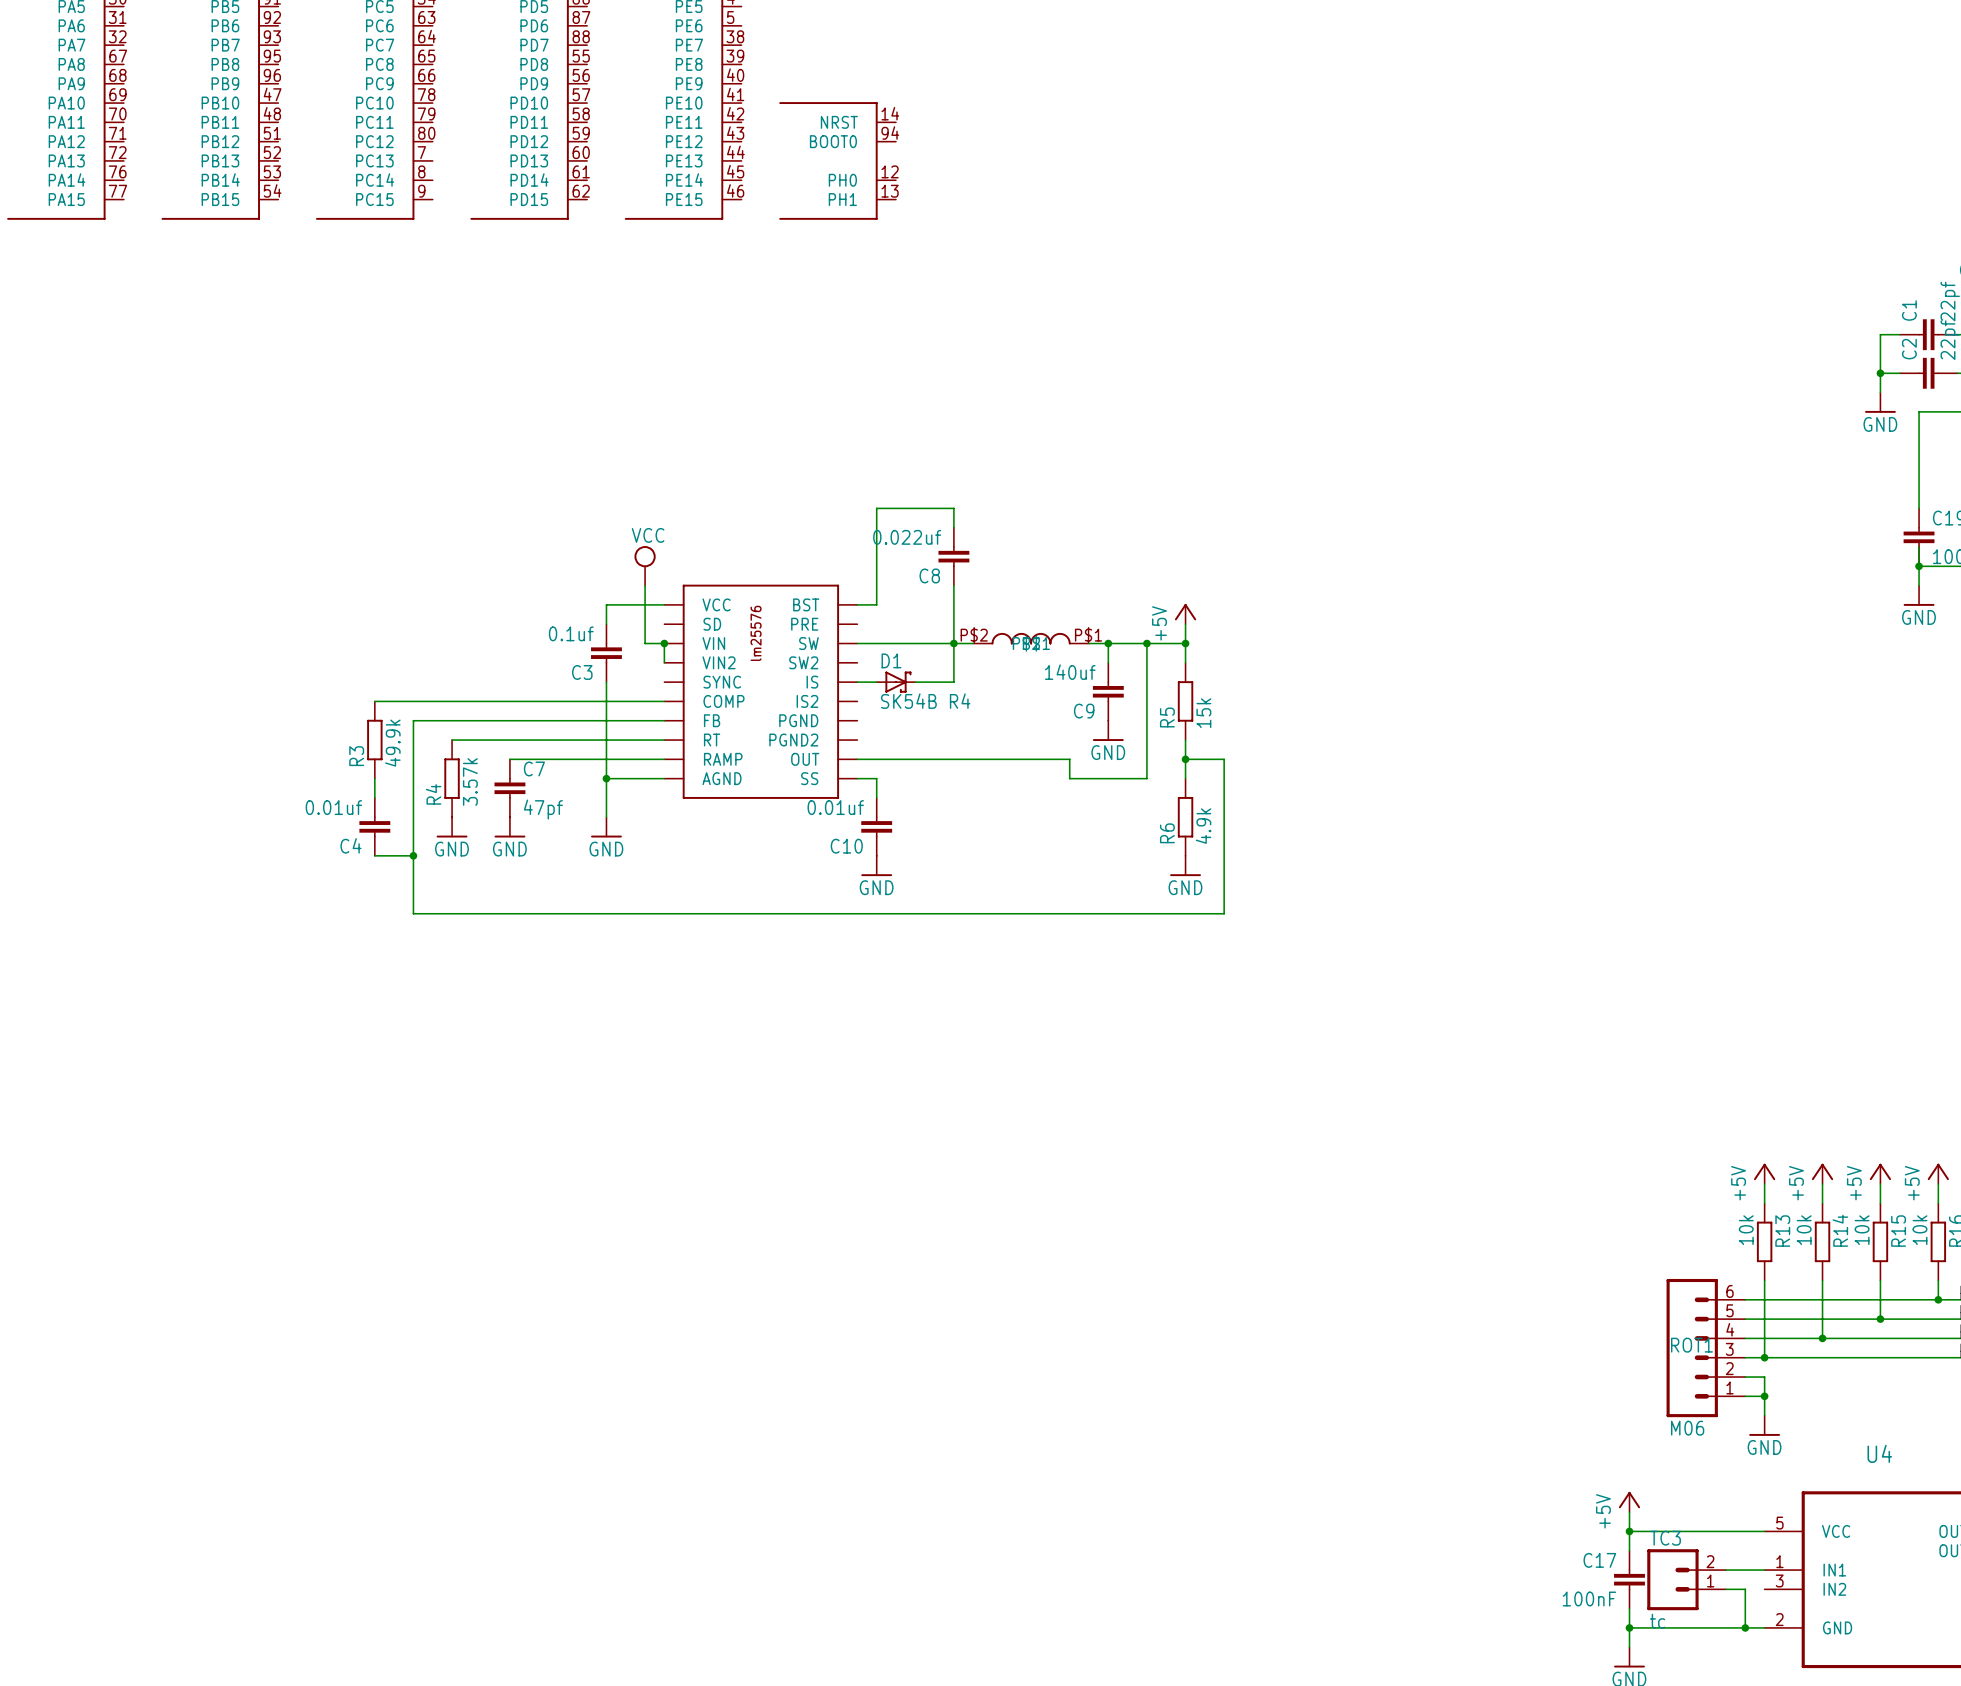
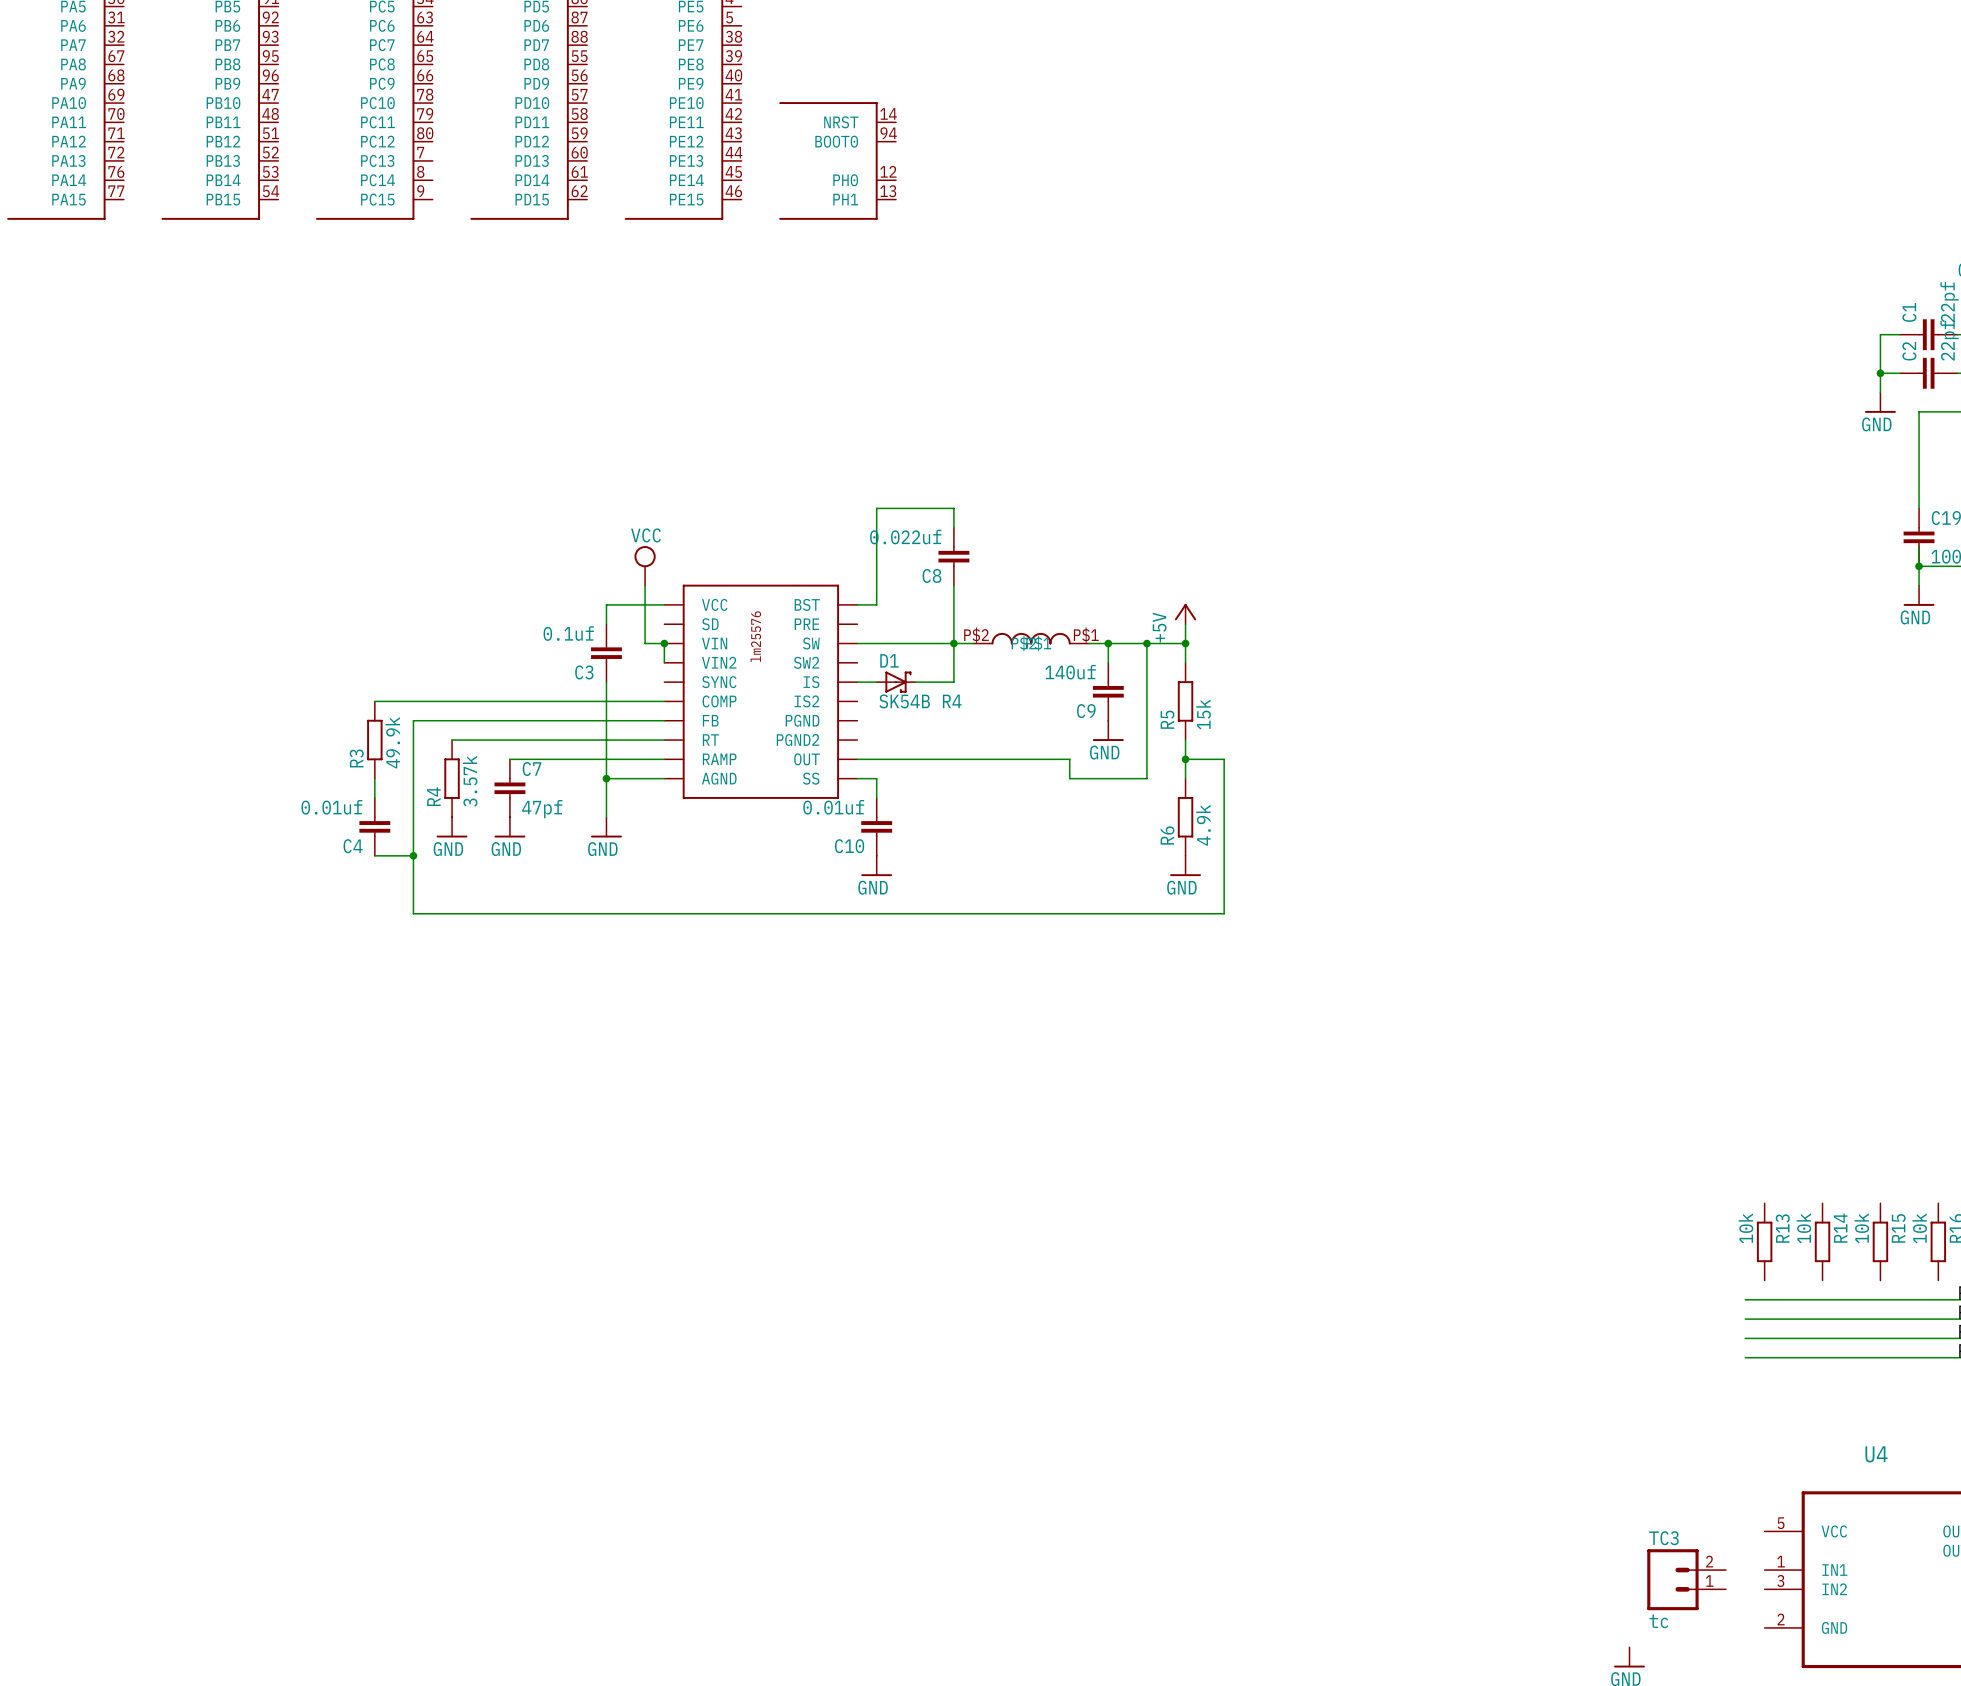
power symbol: +5V (1764, 1173) -> none
power symbol: +5V (1822, 1173) -> none
power symbol: +5V (1880, 1173) -> none
power symbol: +5V (1938, 1173) -> none
wire: (1764, 1183) (1764, 1203) -> none
wire: (1822, 1183) (1822, 1203) -> none
wire: (1880, 1183) (1880, 1203) -> none
wire: (1938, 1183) (1938, 1203) -> none
wire: (1764, 1280) (1764, 1357) -> none
wire: (1822, 1280) (1822, 1338) -> none
wire: (1880, 1280) (1880, 1319) -> none
wire: (1938, 1280) (1938, 1299) -> none
junction: (1938, 1299) -> none
junction: (1880, 1319) -> none
junction: (1822, 1338) -> none
ROT1: M06 (1705, 1348) -> none
junction: (1764, 1357) -> none
wire: (1745, 1377) (1764, 1377) (1764, 1415) -> none
wire: (1745, 1396) (1764, 1396) -> none
junction: (1764, 1396) -> none
power symbol: GND (1764, 1425) -> none
power symbol: +5V (1629, 1502) -> none
wire: (1629, 1512) (1629, 1550) -> none
wire: (1629, 1531) (1764, 1531) -> none
junction: (1629, 1531) -> none
wire: (1726, 1570) (1764, 1570) -> none
C17: 100nF (1629, 1579) -> none
wire: (1726, 1589) (1745, 1589) (1745, 1627) -> none
wire: (1629, 1608) (1629, 1647) -> none
wire: (1629, 1627) (1764, 1627) -> none
junction: (1629, 1627) -> none
junction: (1745, 1627) -> none

